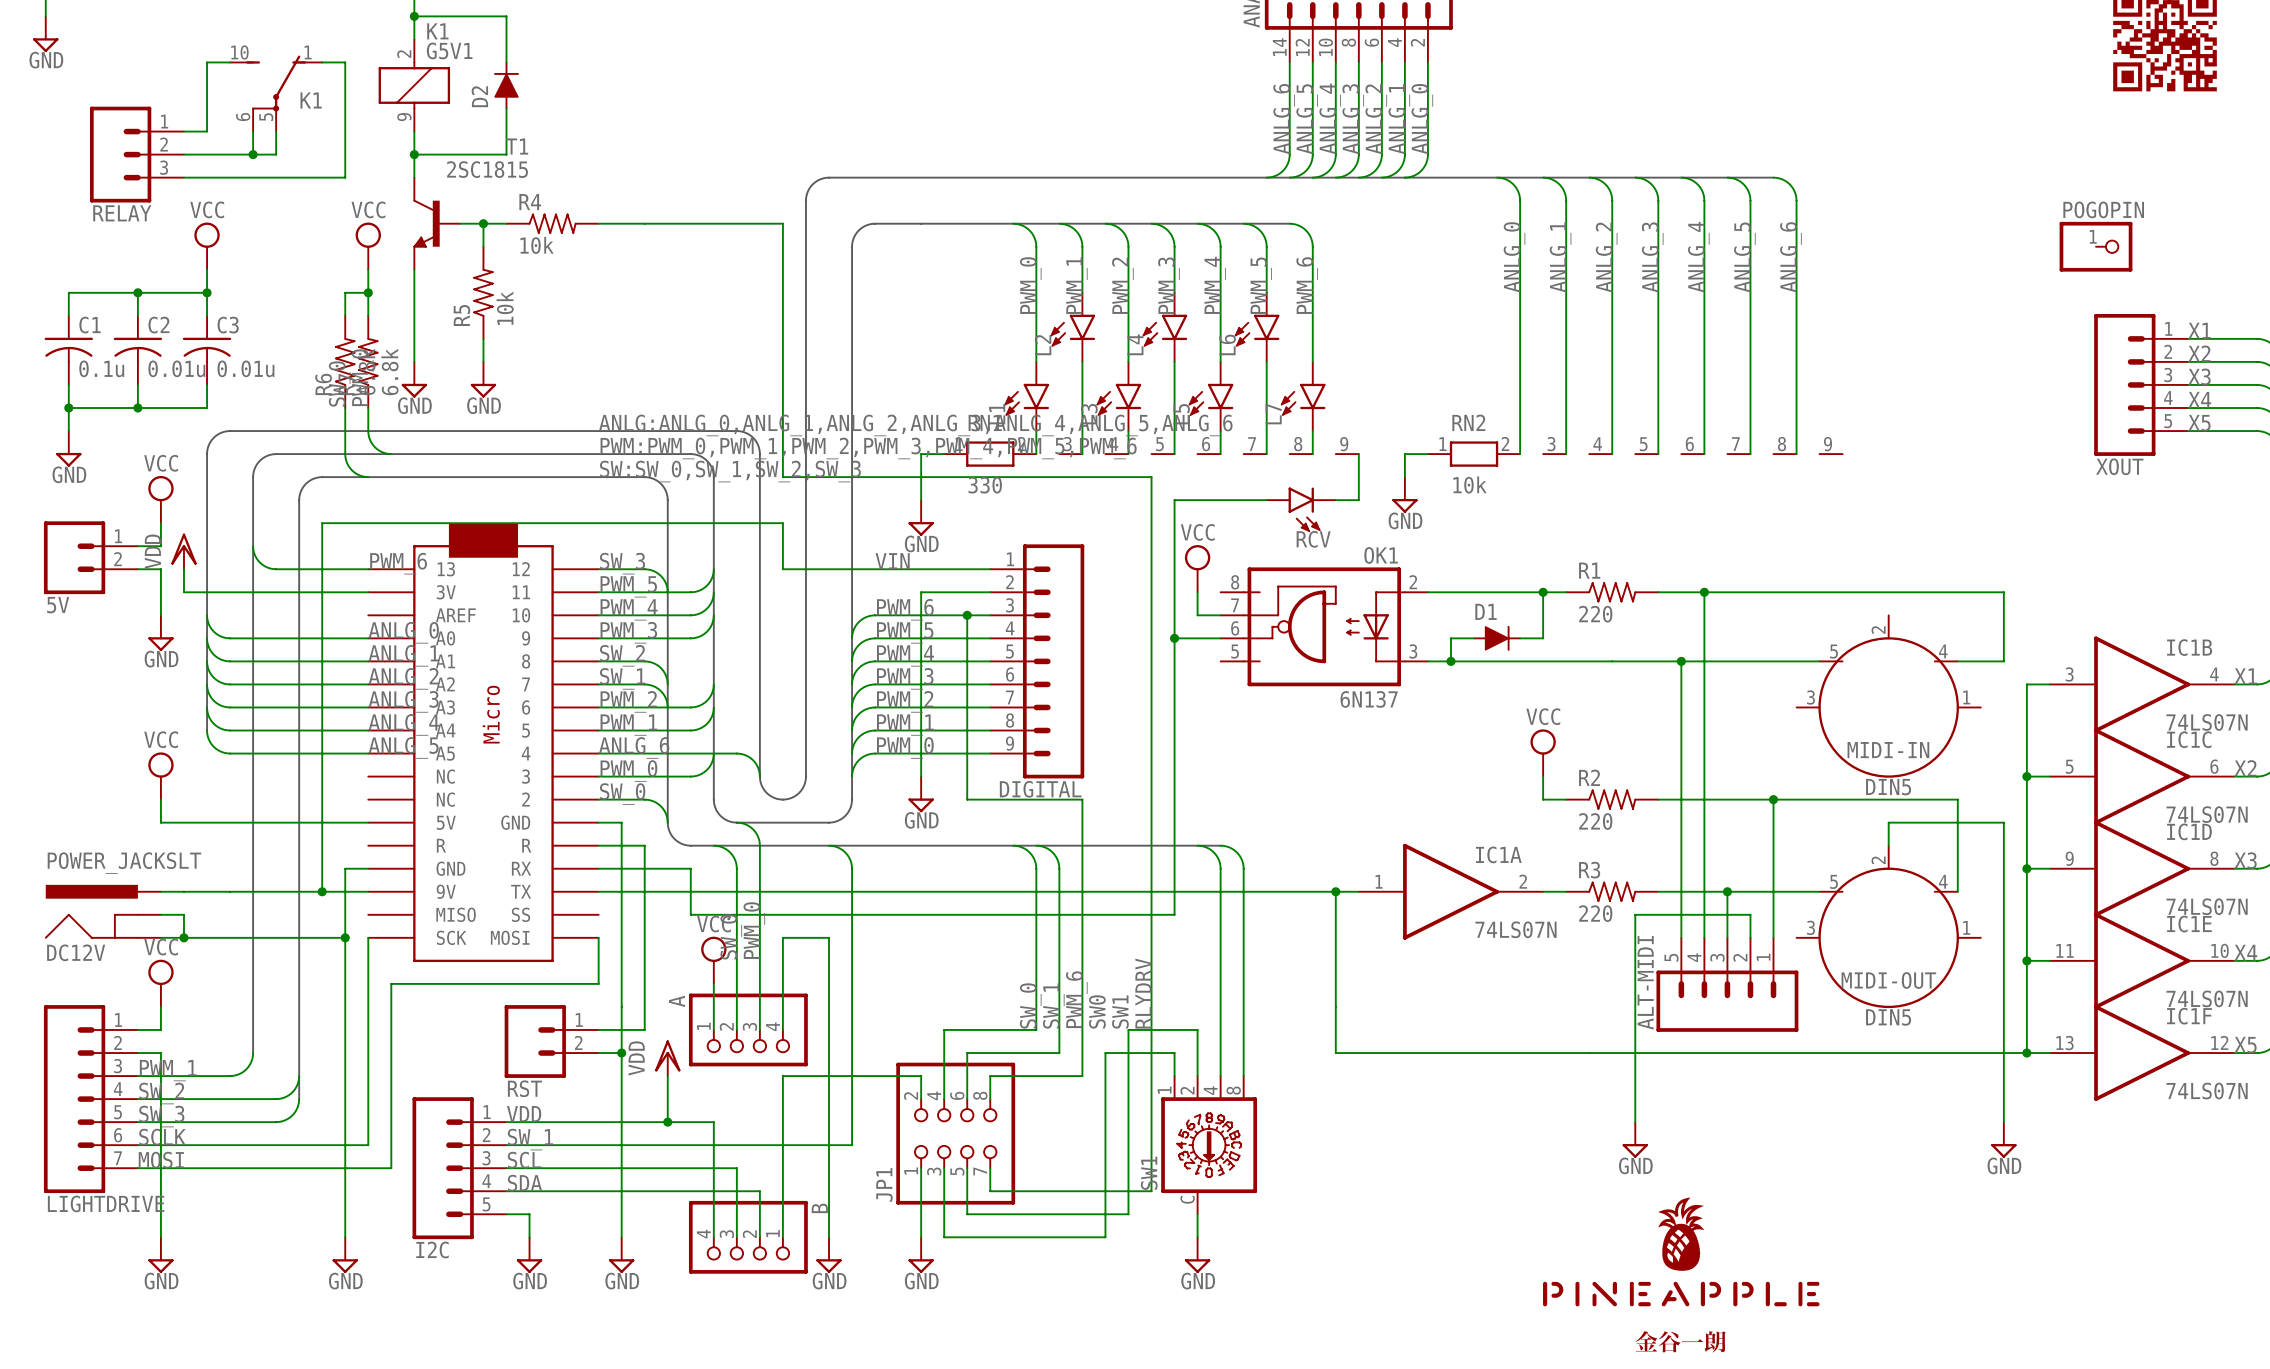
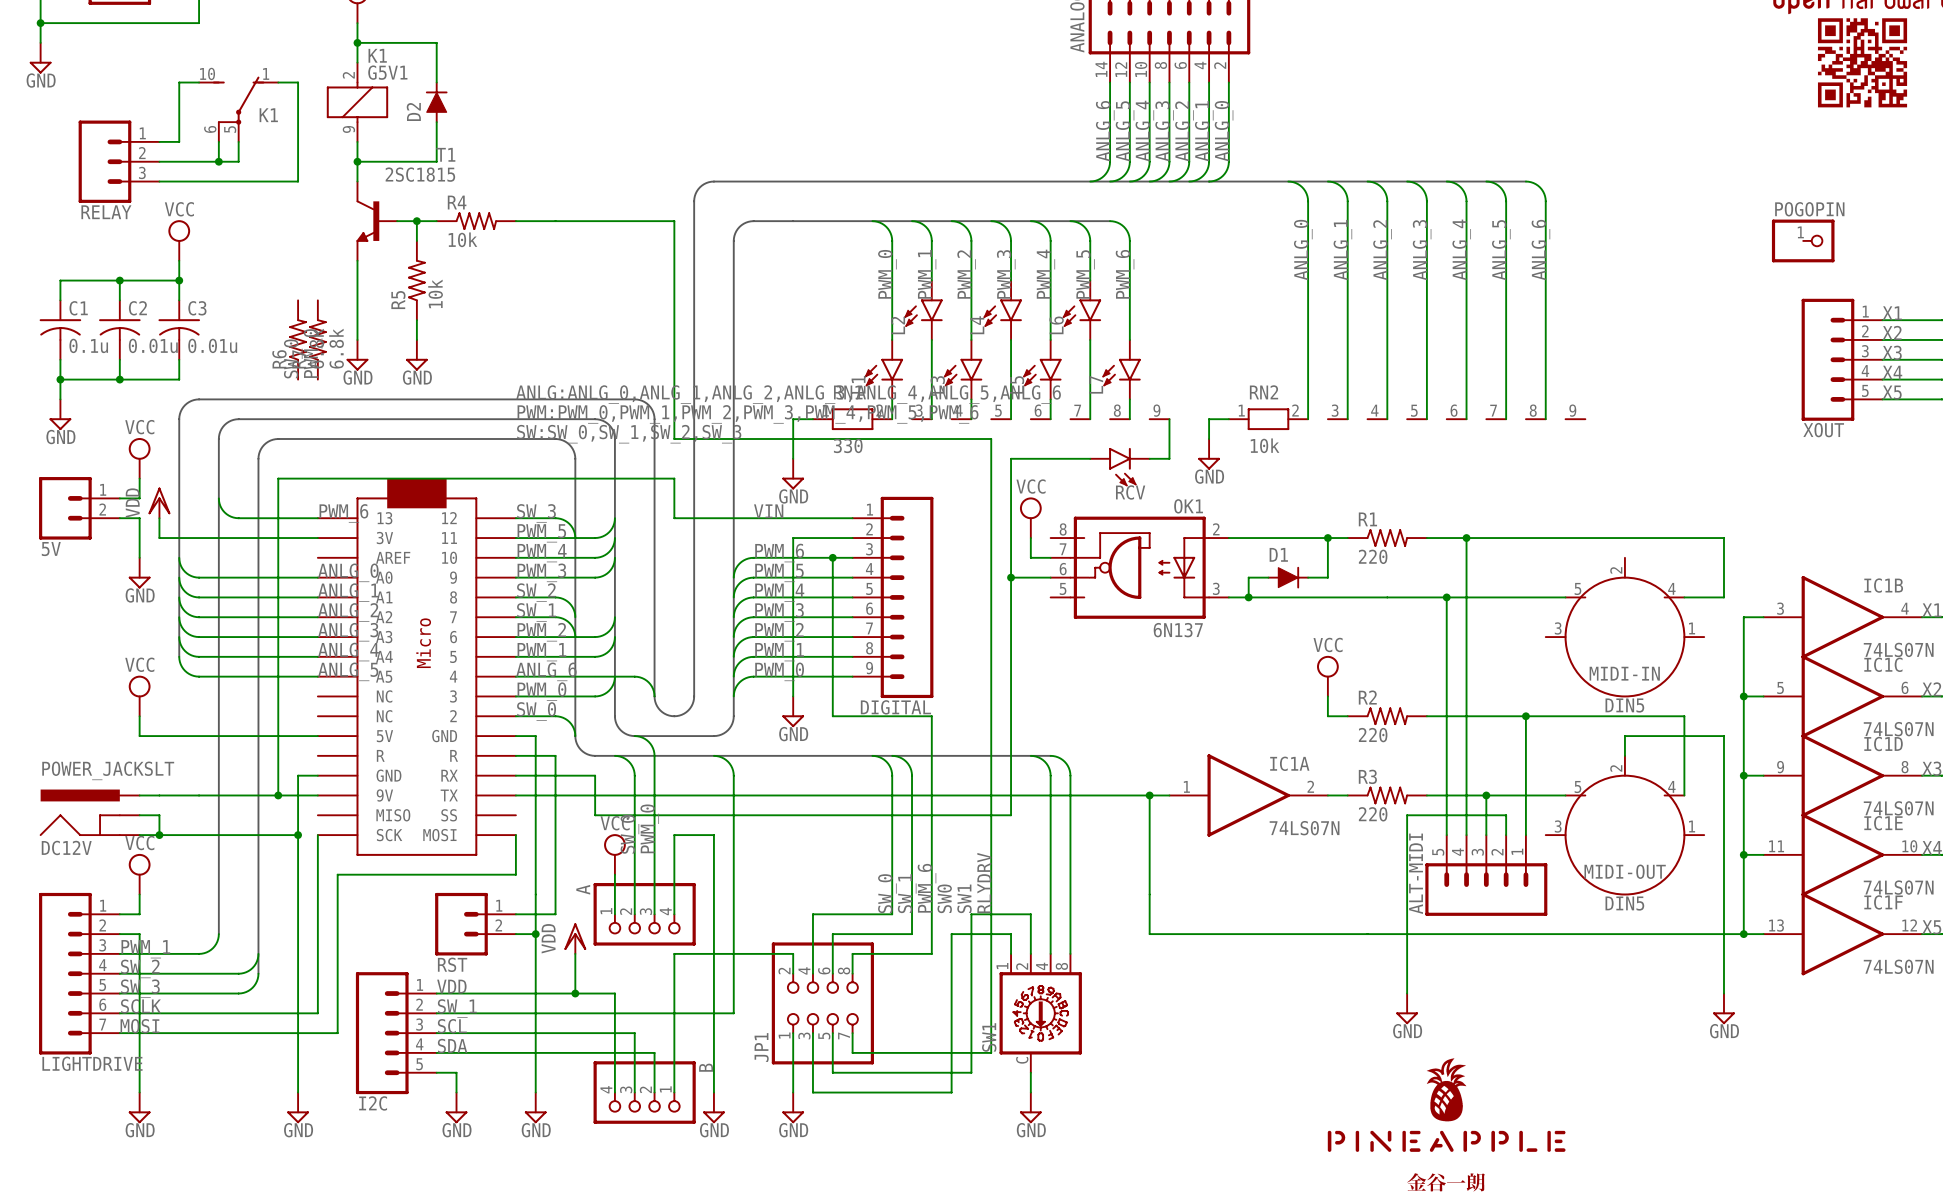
power symbol: VCC (368, 246) -> none
wire: (368, 269) (368, 315) -> none
wire: (368, 292) (345, 292) (345, 315) -> none
junction: (368, 292) -> none
wire: (345, 408) (346, 460) (354, 472) (368, 477) -> none
wire: (368, 408) (368, 434) (371, 442) (379, 450) (391, 454) -> none

